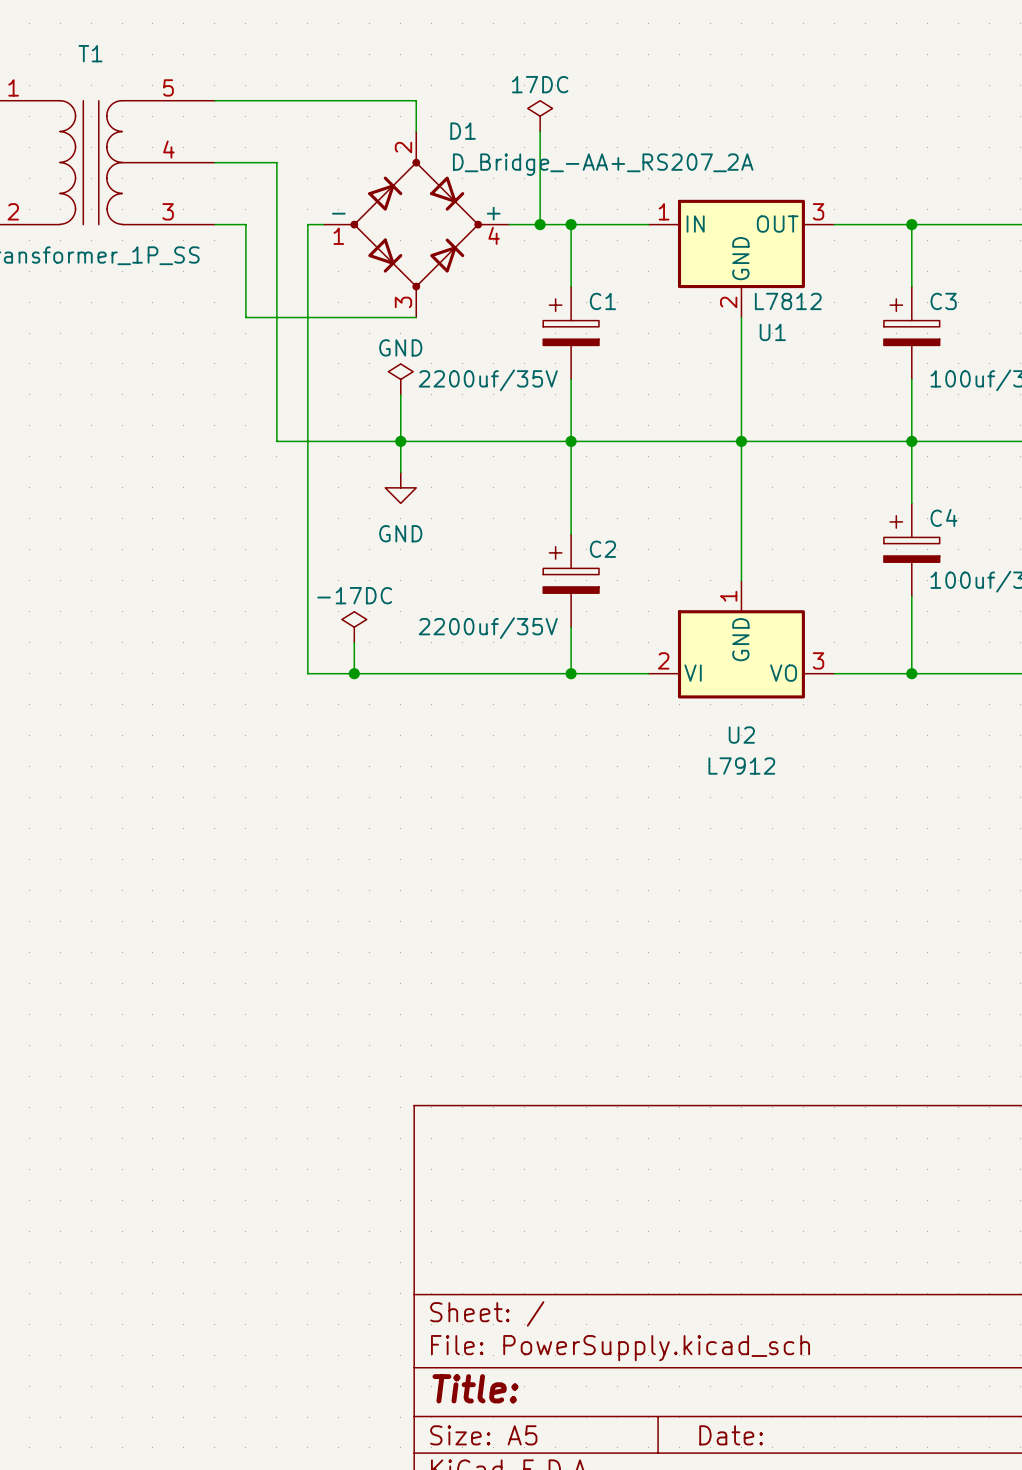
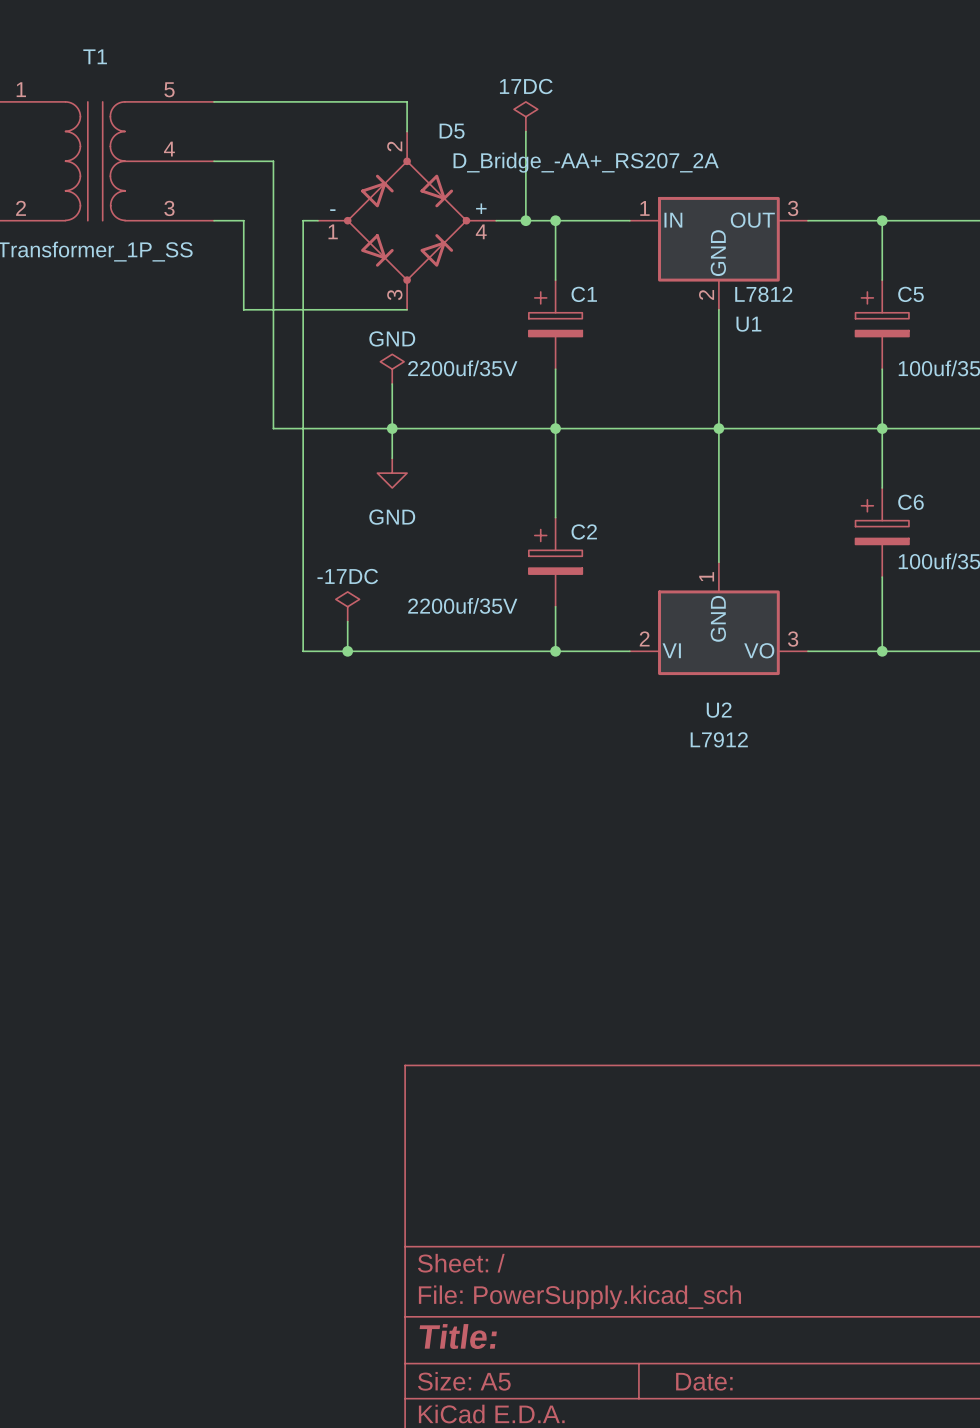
D1 name: D1 (463, 131) -> D5 (452, 131)
C3 name: C3 (943, 301) -> C5 (910, 294)
C4 name: C4 (943, 517) -> C6 (910, 502)

